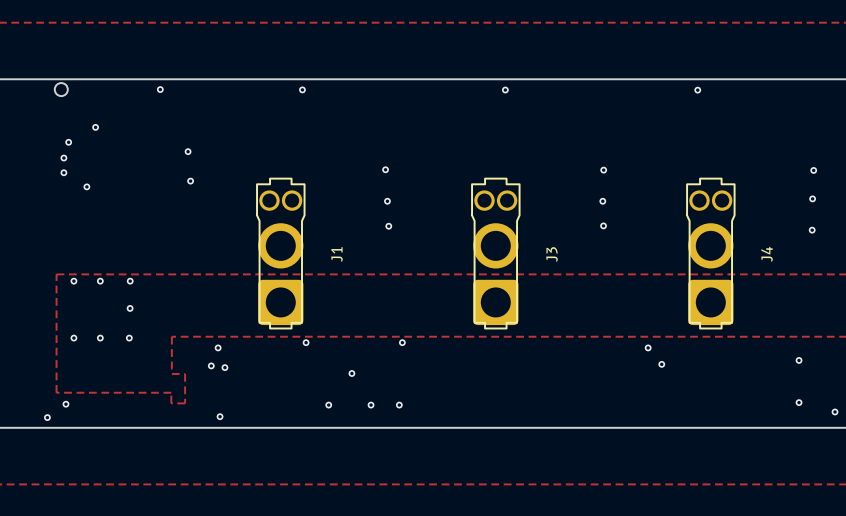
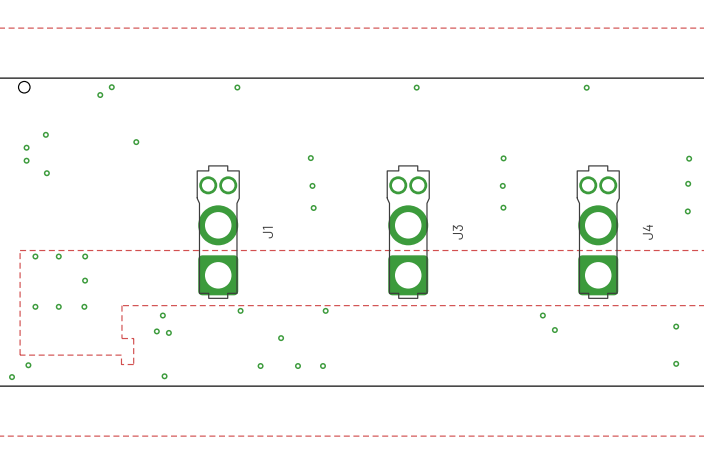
via: none -> (100, 95)
via: (95, 127) -> none
via: (68, 142) -> none
via: none -> (45, 134)
via: (190, 181) -> none

